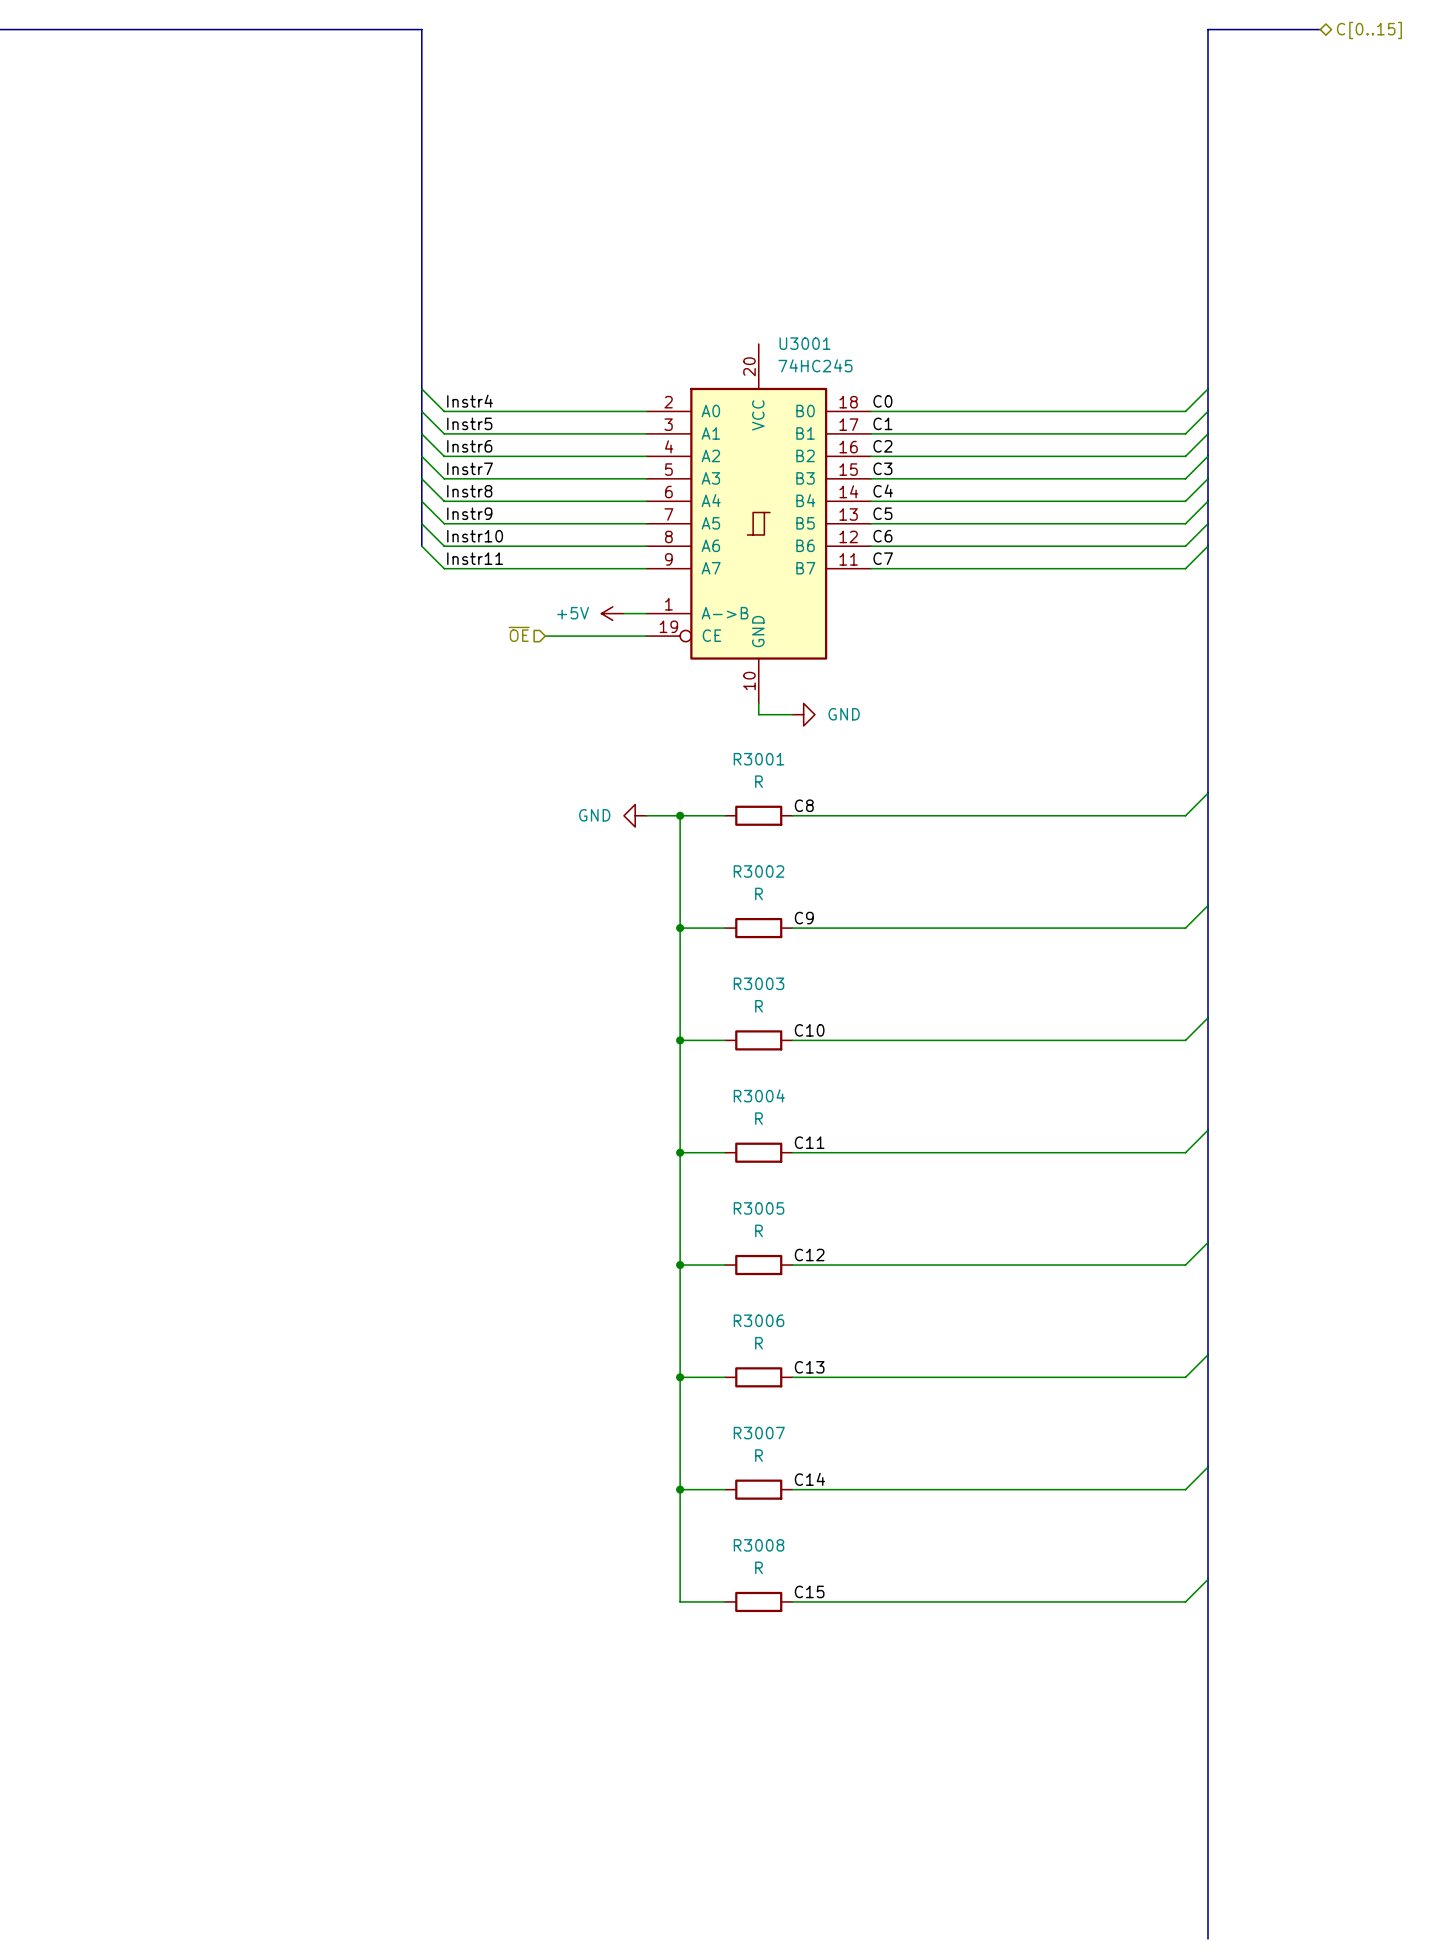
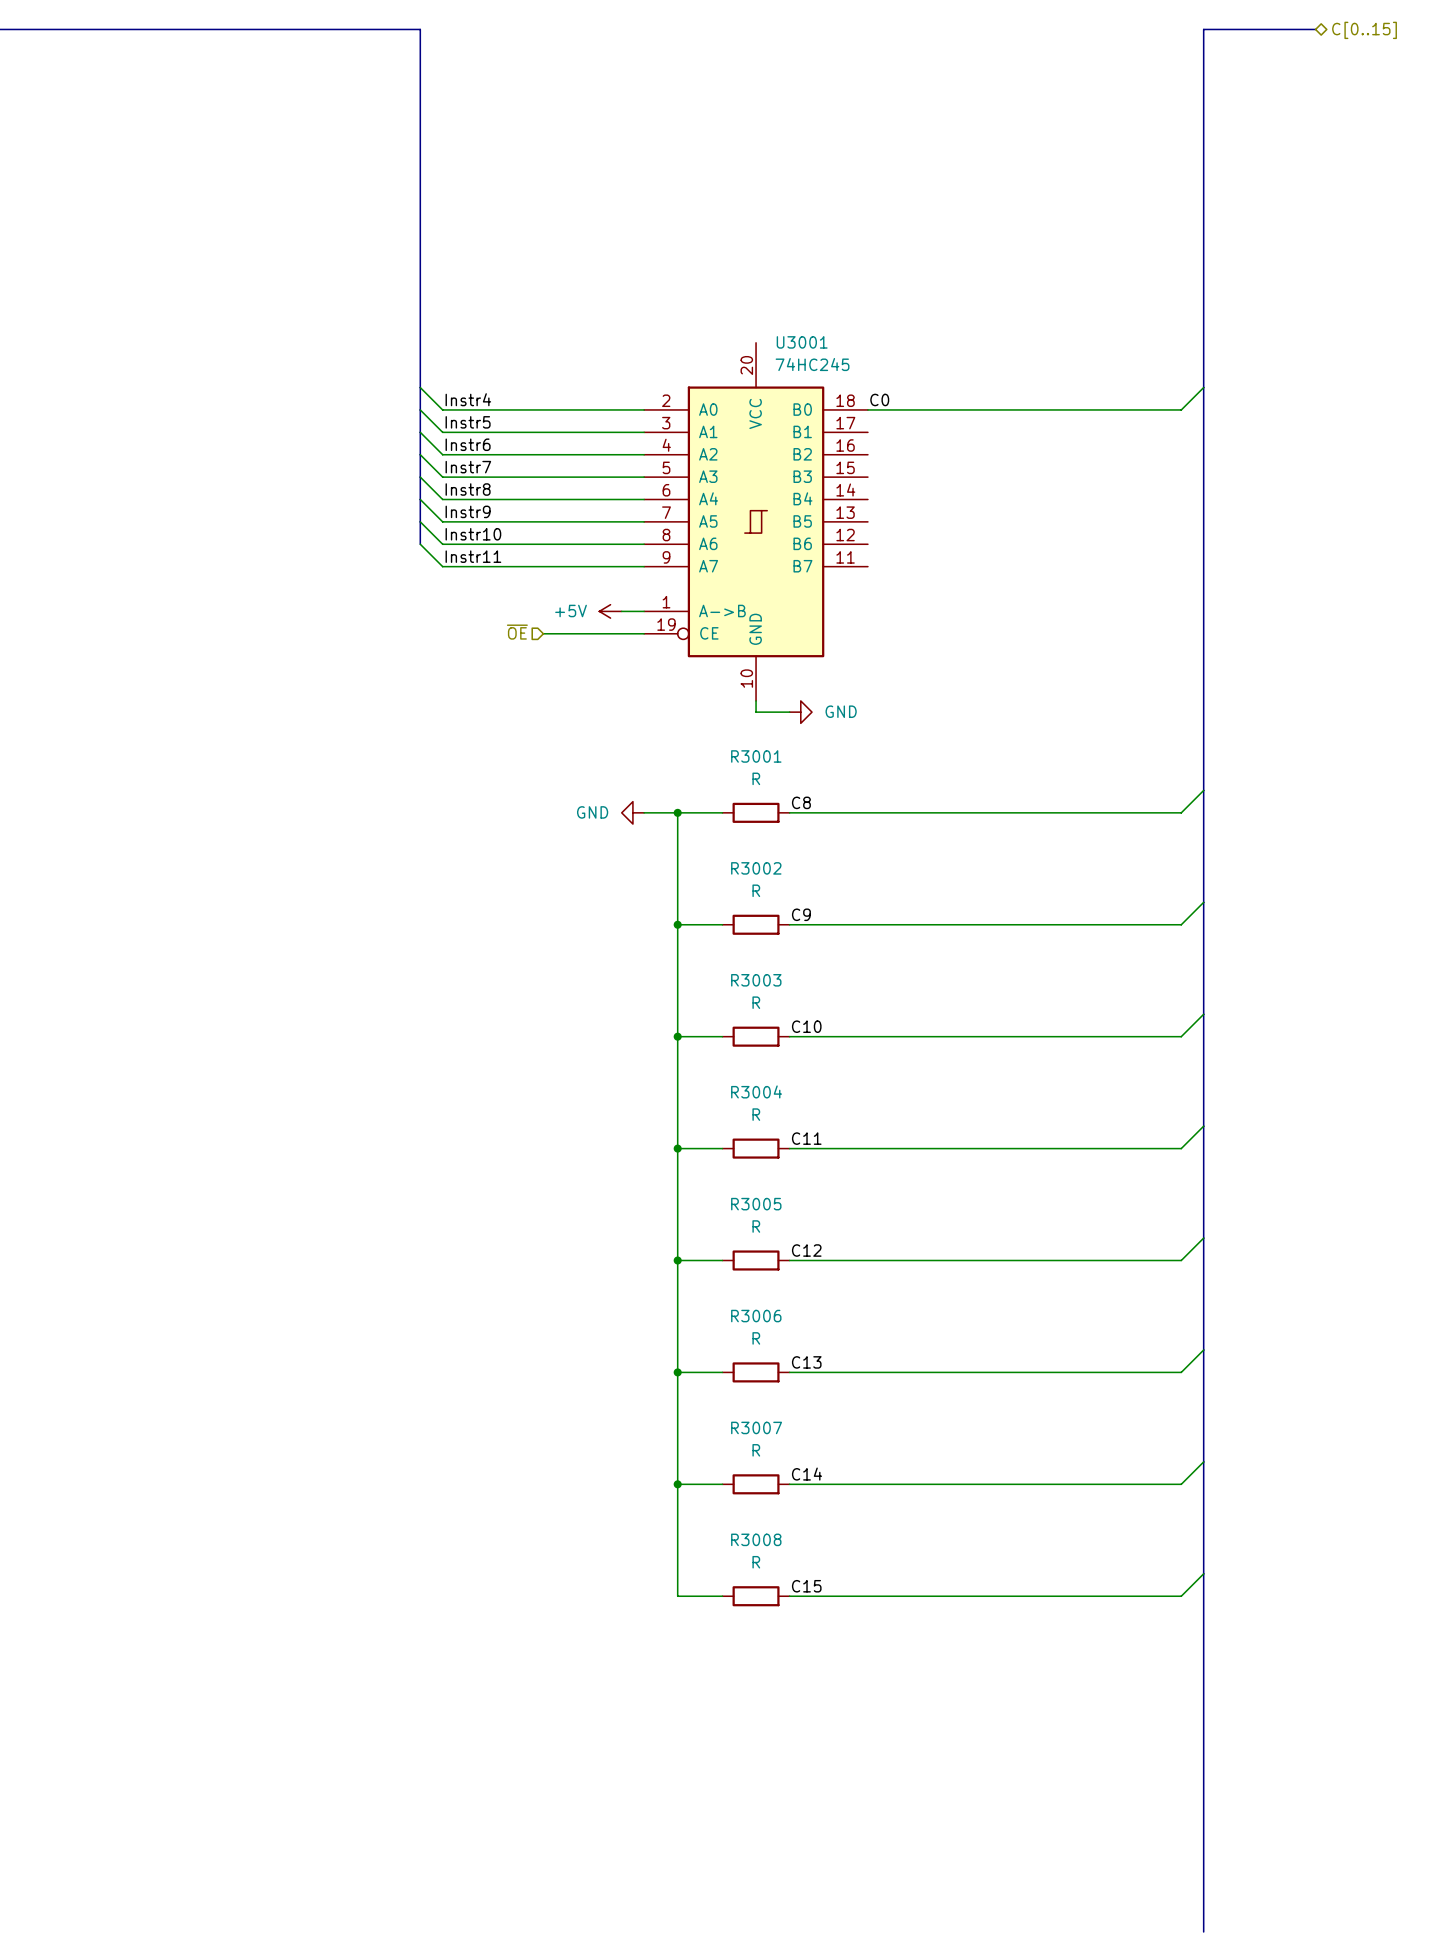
wire: (1208, 411) (1185, 433) (871, 433) -> none
label: C1 (882, 423) -> none
wire: (1208, 433) (1185, 456) (871, 456) -> none
label: C2 (882, 446) -> none
wire: (1208, 456) (1185, 478) (871, 478) -> none
label: C3 (882, 468) -> none
wire: (1208, 478) (1185, 501) (871, 501) -> none
label: C4 (883, 491) -> none
wire: (1208, 501) (1185, 523) (871, 523) -> none
label: C5 (882, 513) -> none
wire: (1208, 523) (1185, 546) (871, 546) -> none
label: C6 (882, 536) -> none
wire: (1208, 546) (1185, 568) (871, 568) -> none
label: C7 (883, 558) -> none

